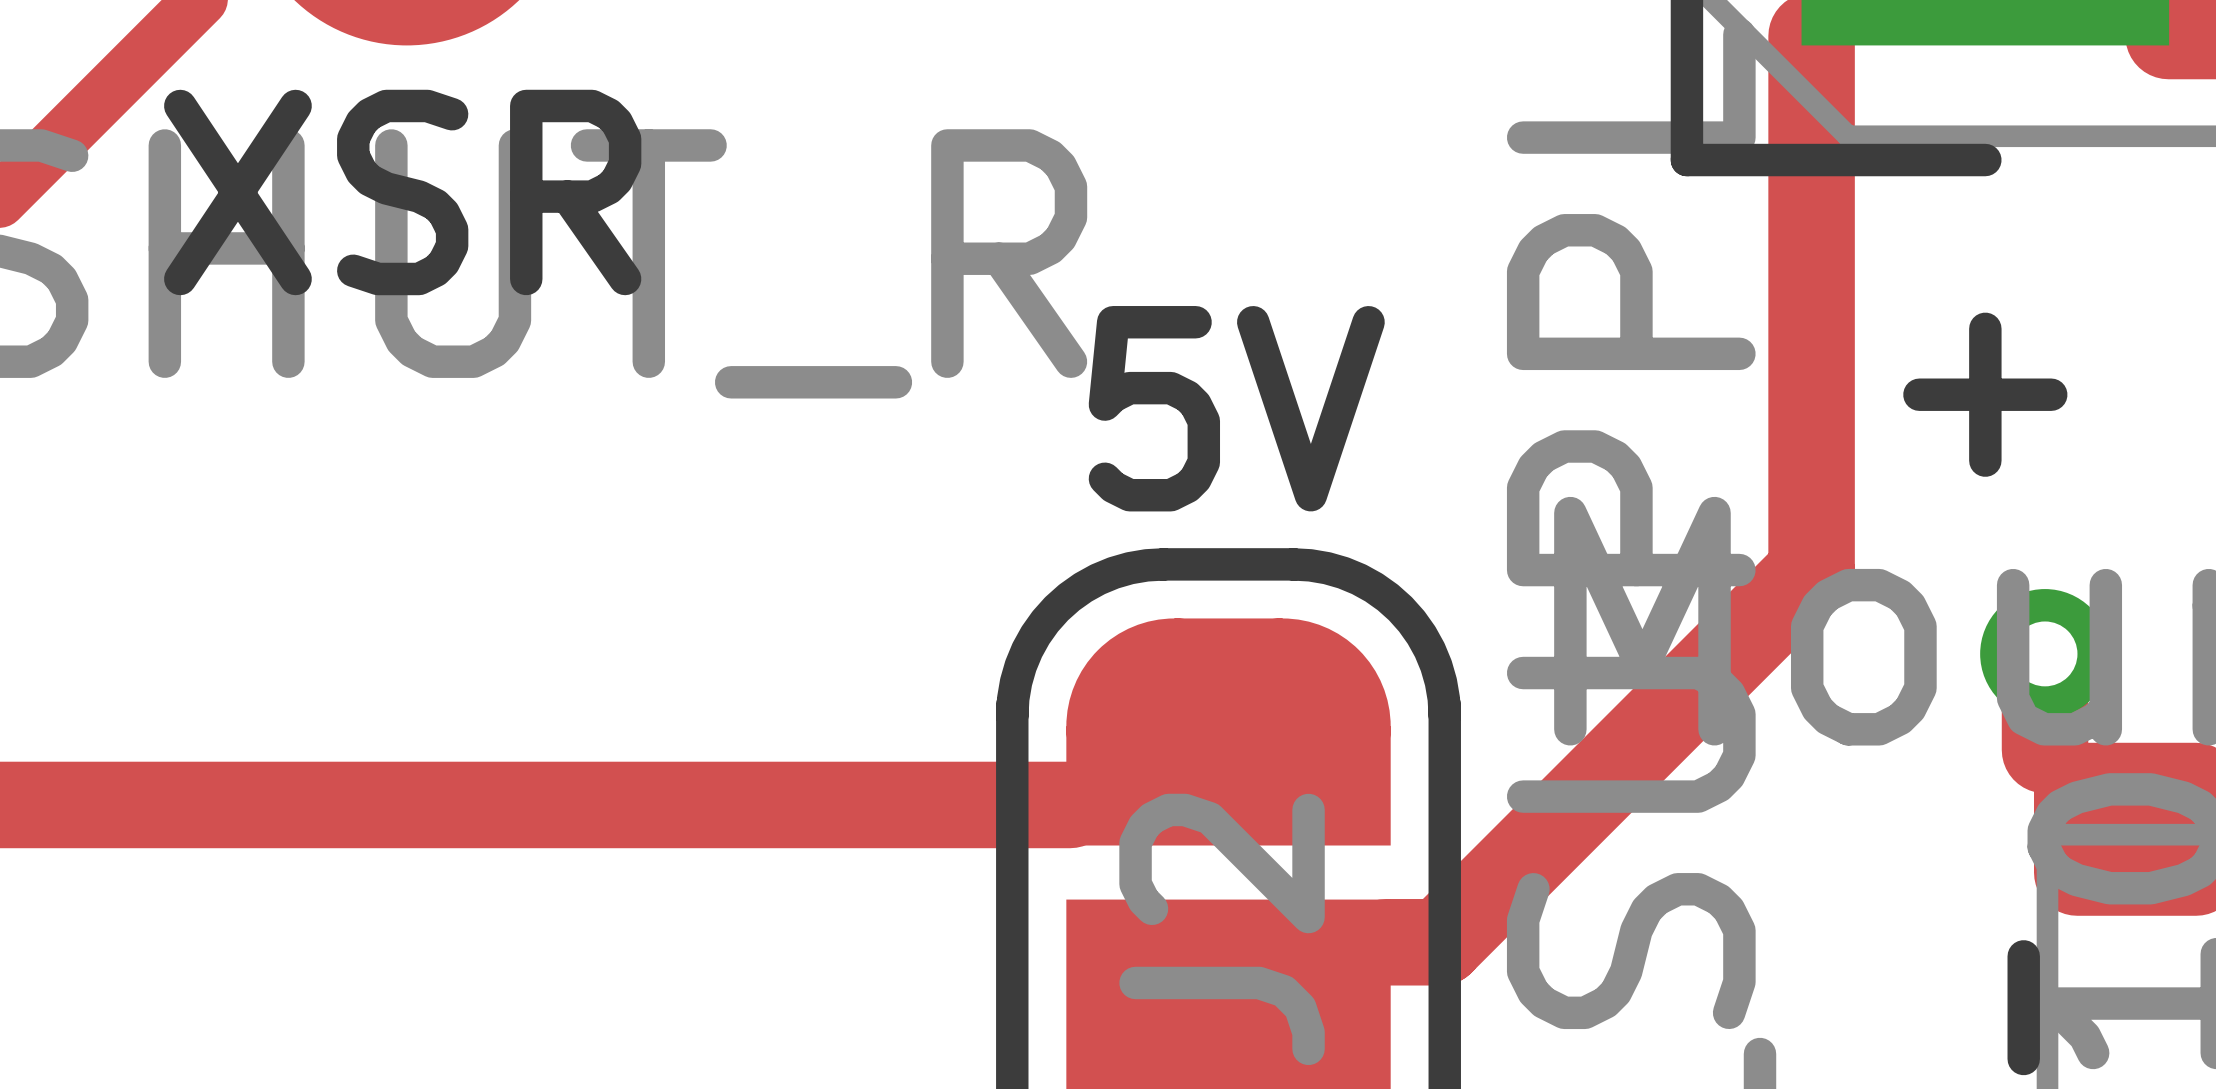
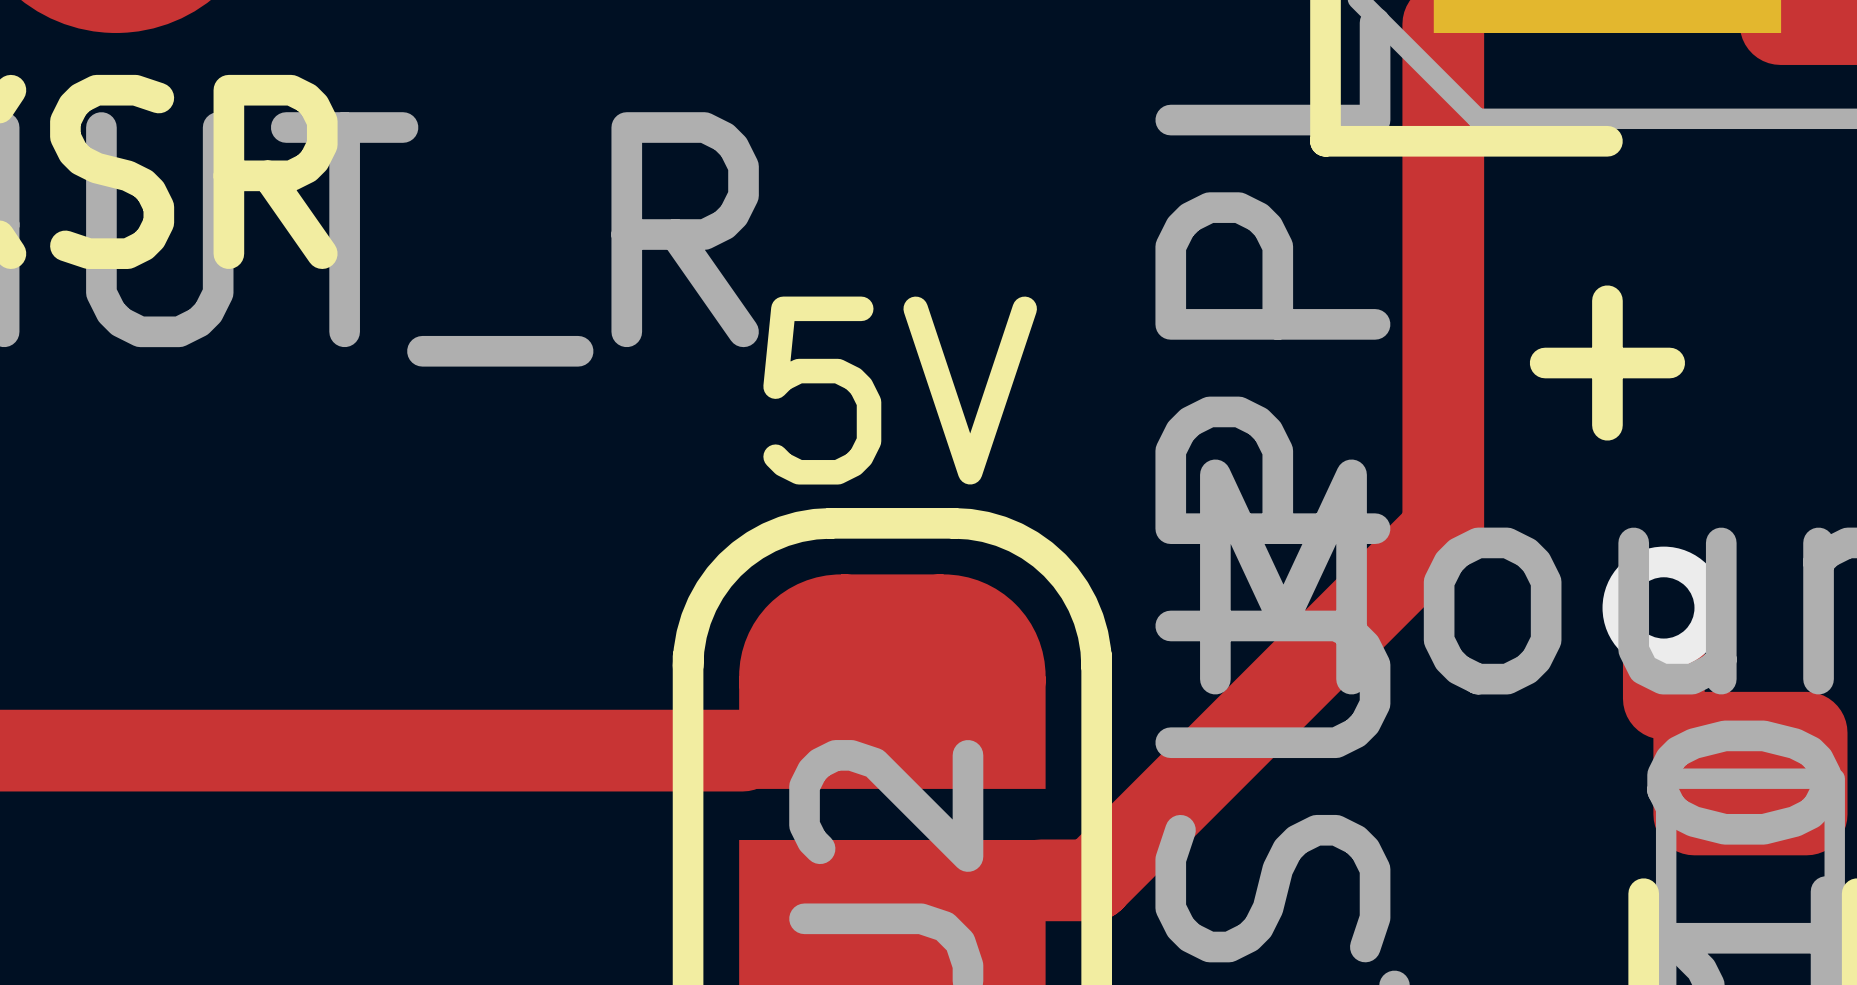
text position: 5V (1236, 408) -> 5V (900, 390)

